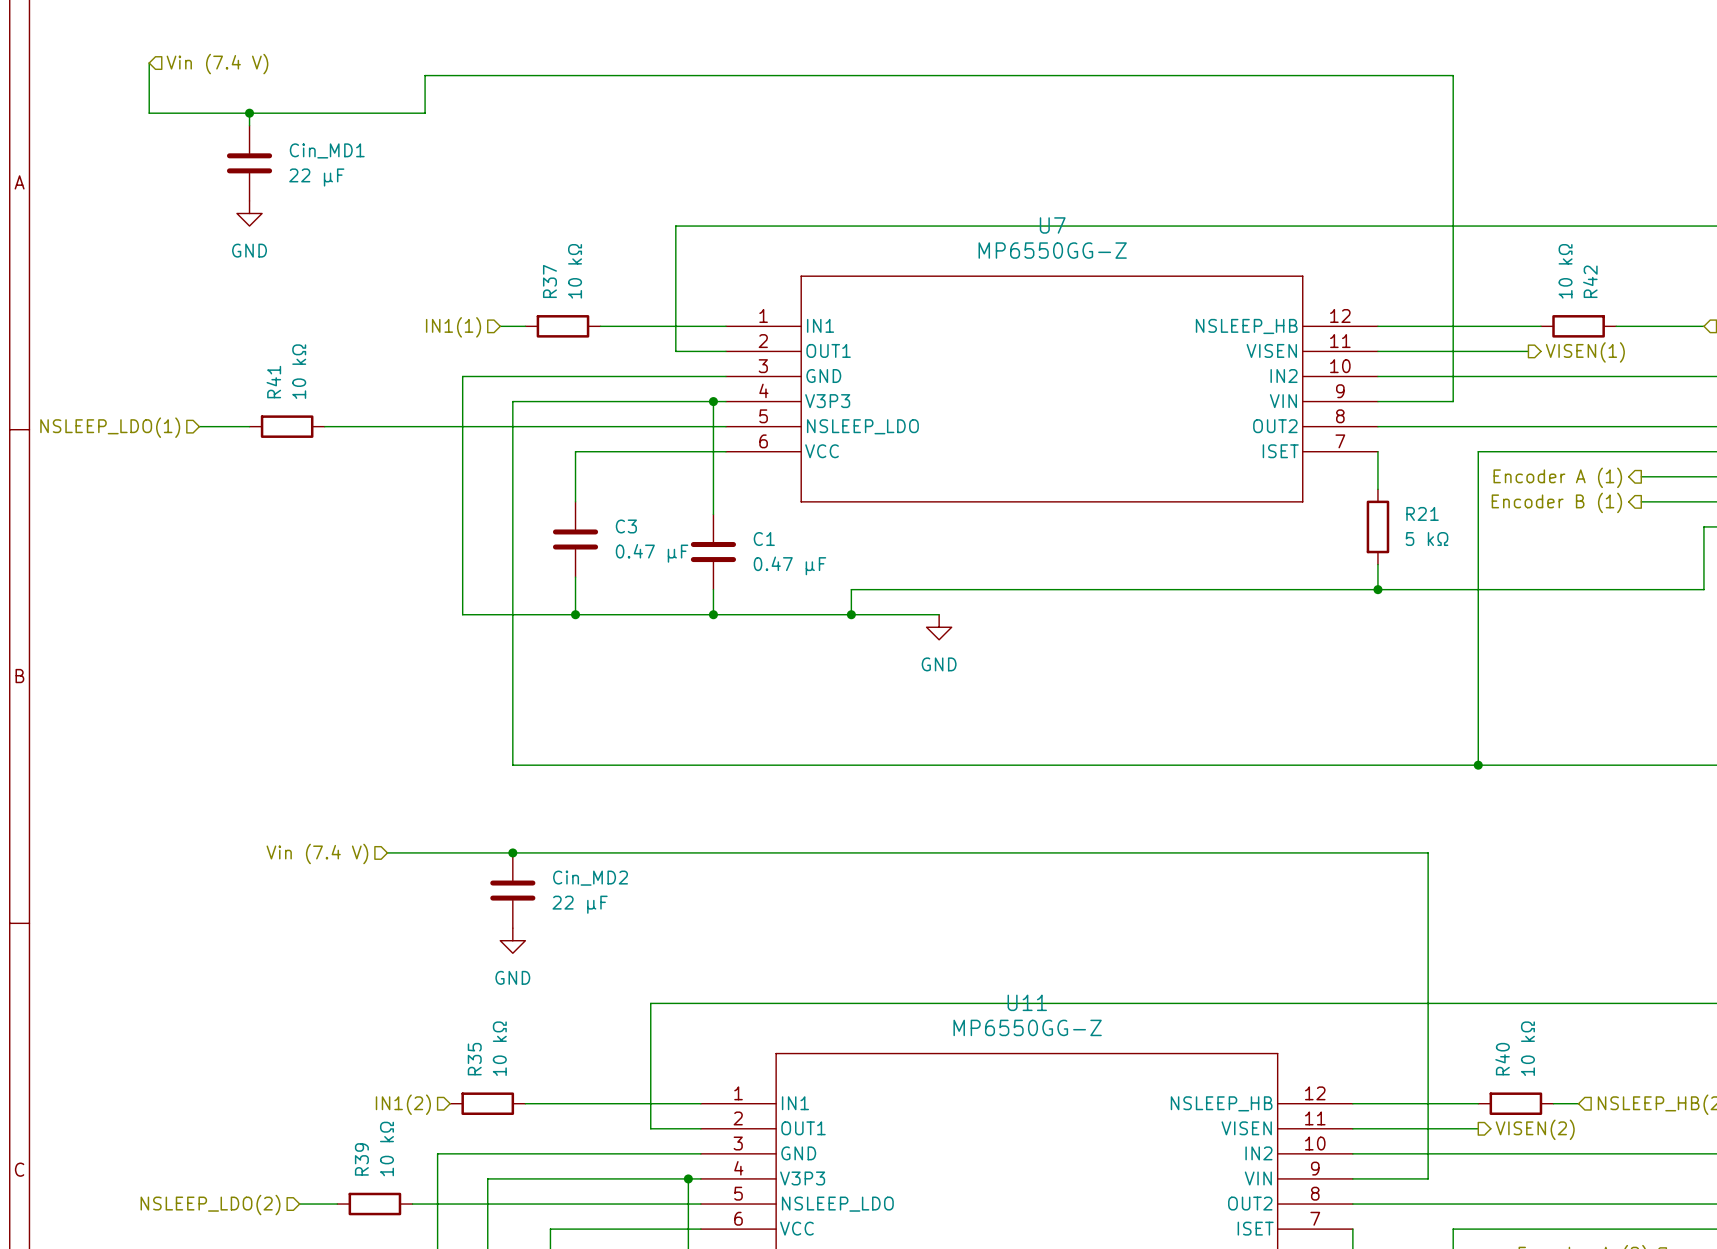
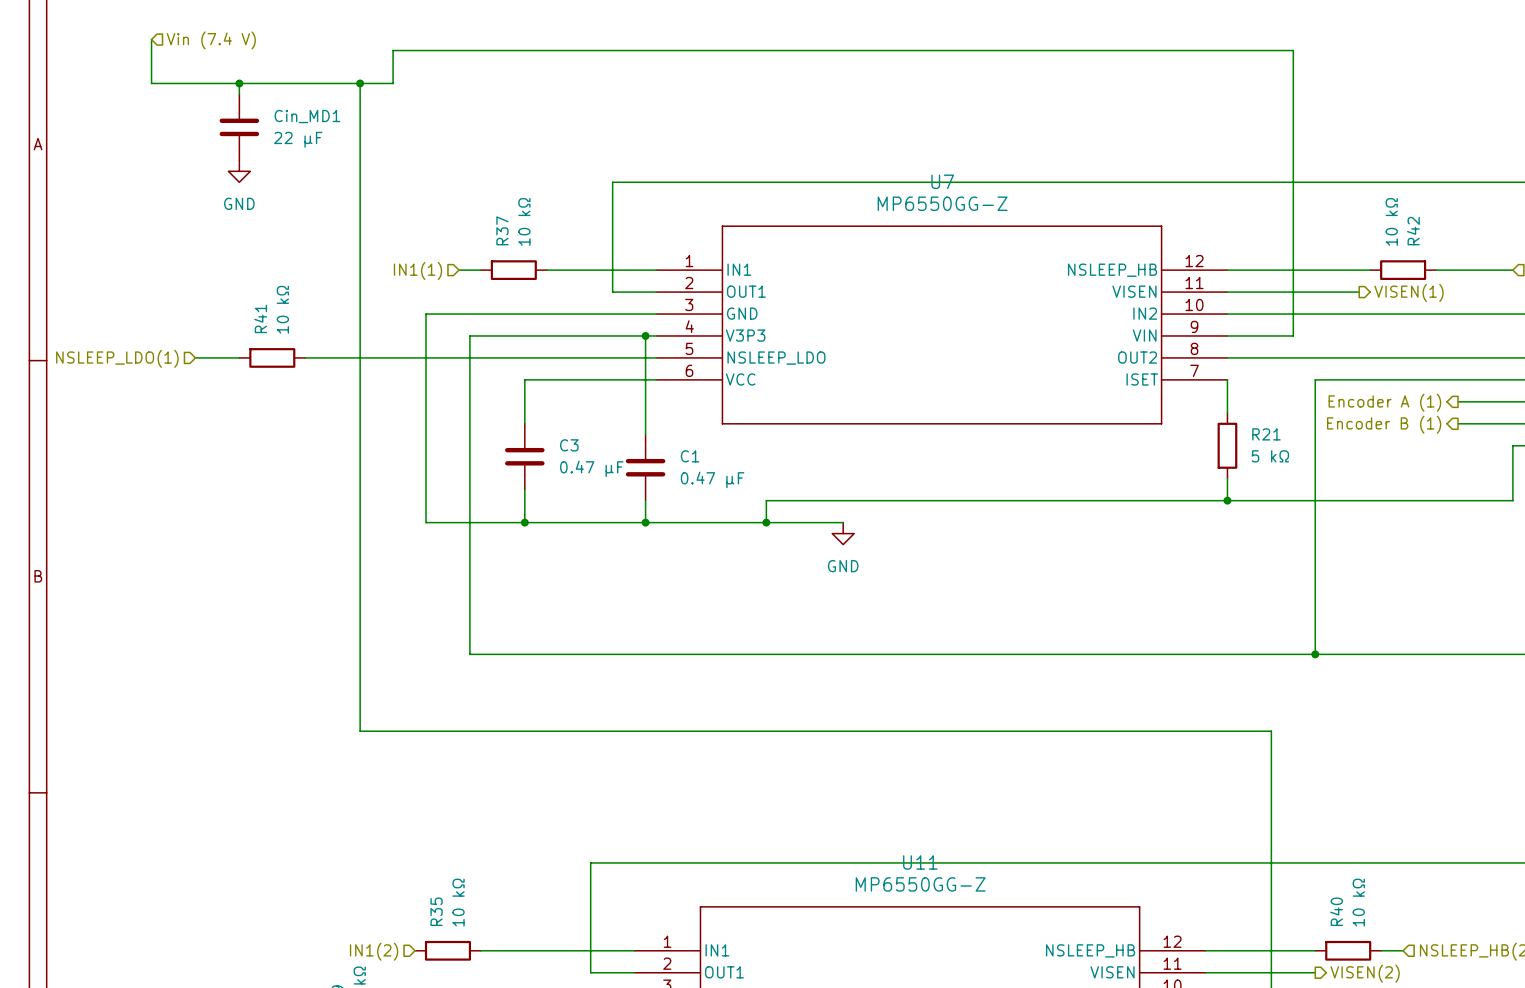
wire: none -> (360, 83) (360, 731)
junction: none -> (360, 83)
junction: (512, 852) -> none
hierarchical label: Vin (7.4 V) (317, 853) -> none
Cin_MD2: 22 μF (512, 890) -> none
power symbol: GND (512, 940) -> none

